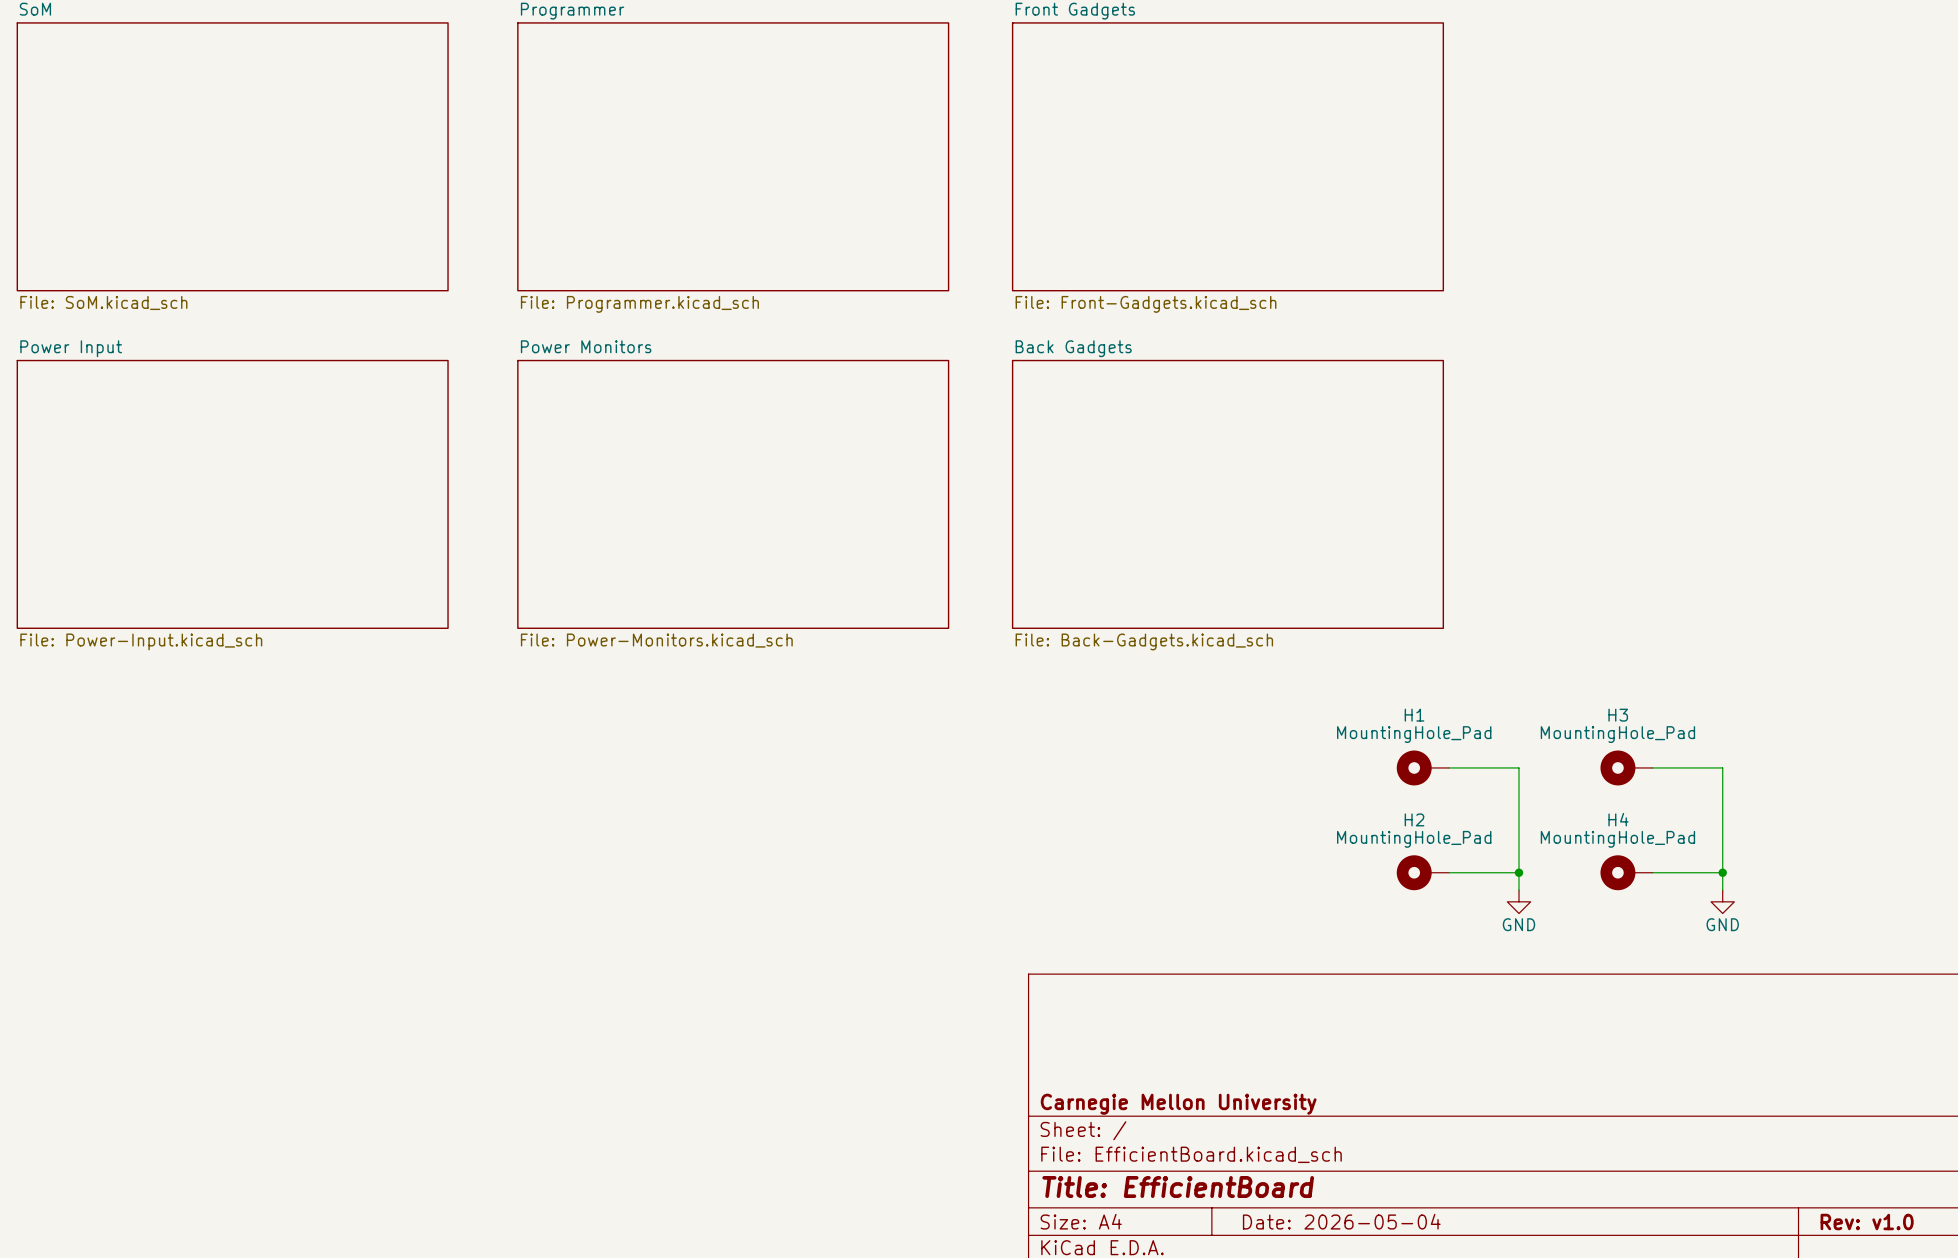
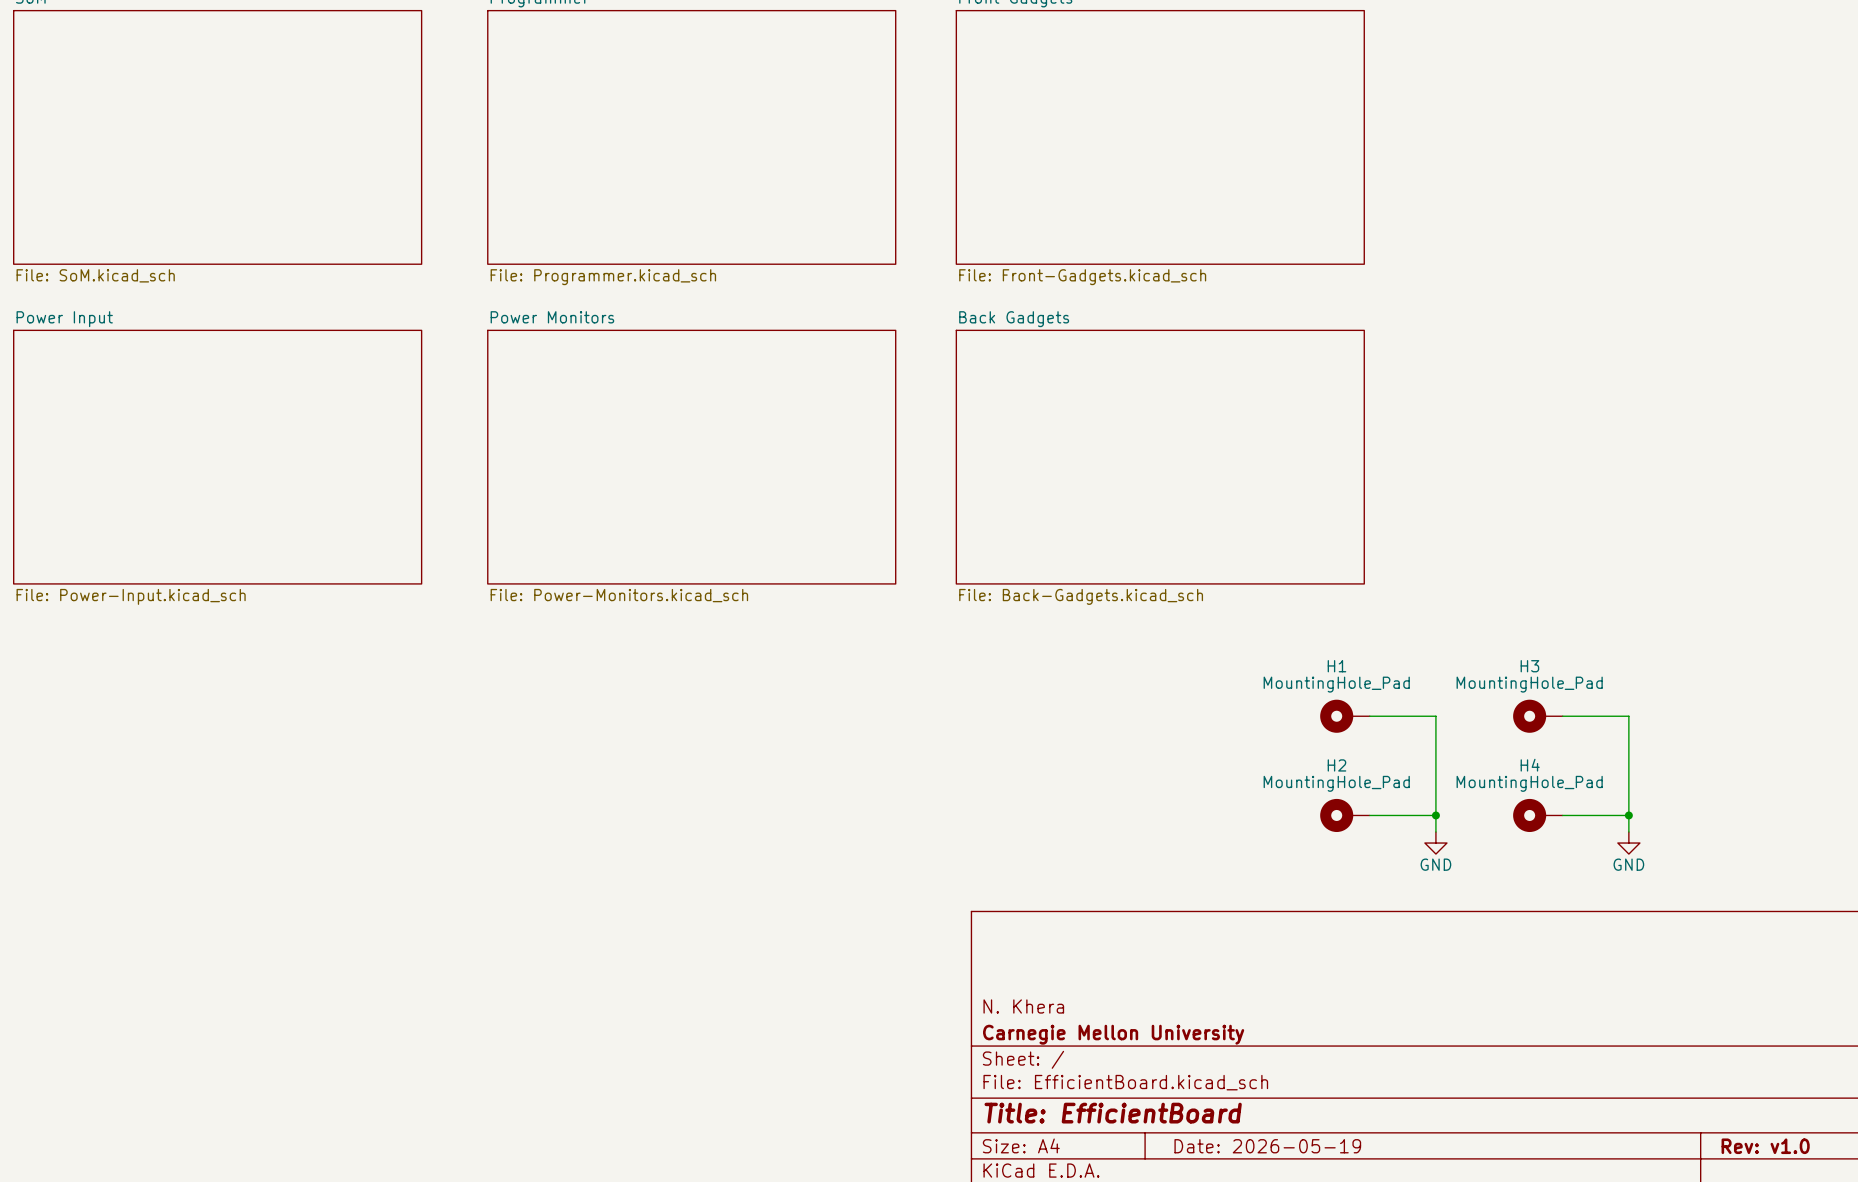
title block: none -> N. Khera (1023, 1006)
title block: Date: 2026-05-04 (1341, 1221) -> Date: 2026-05-19 (1267, 1146)

